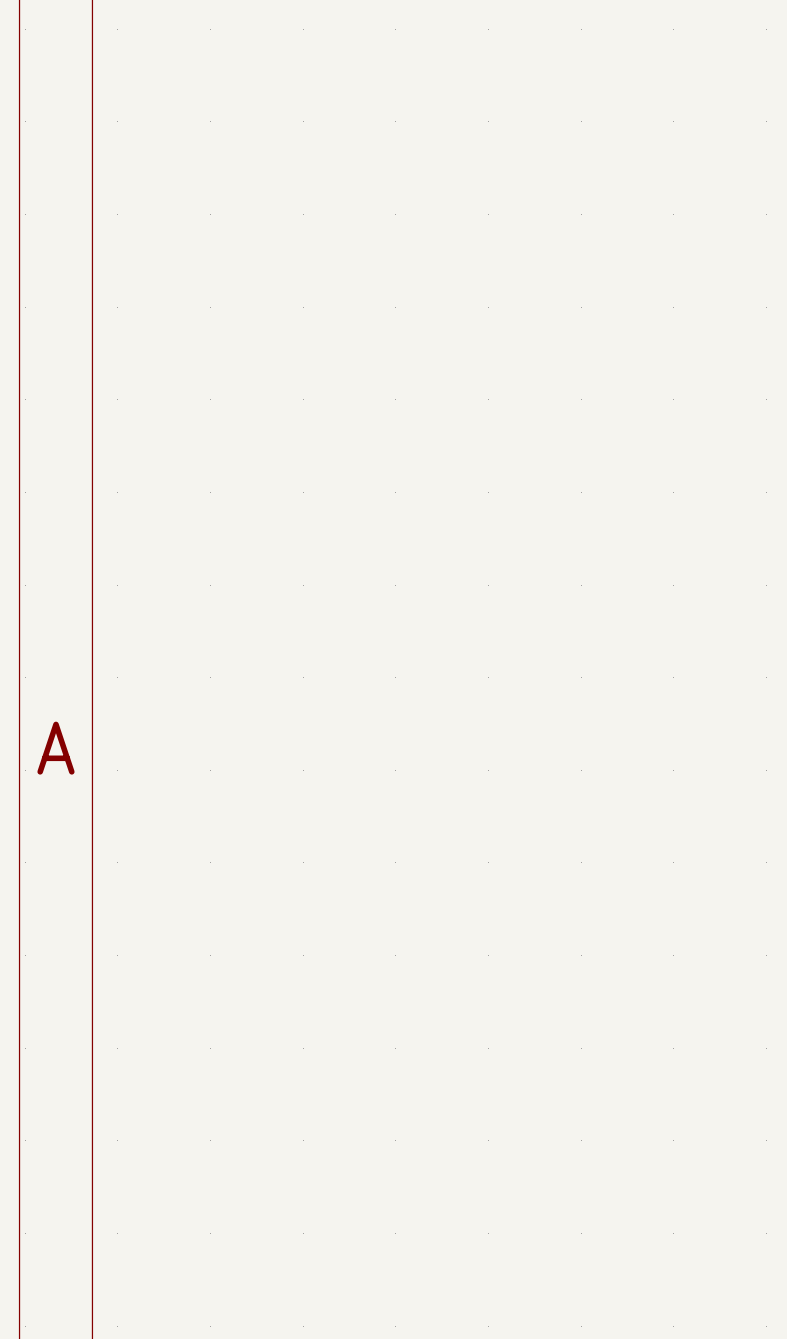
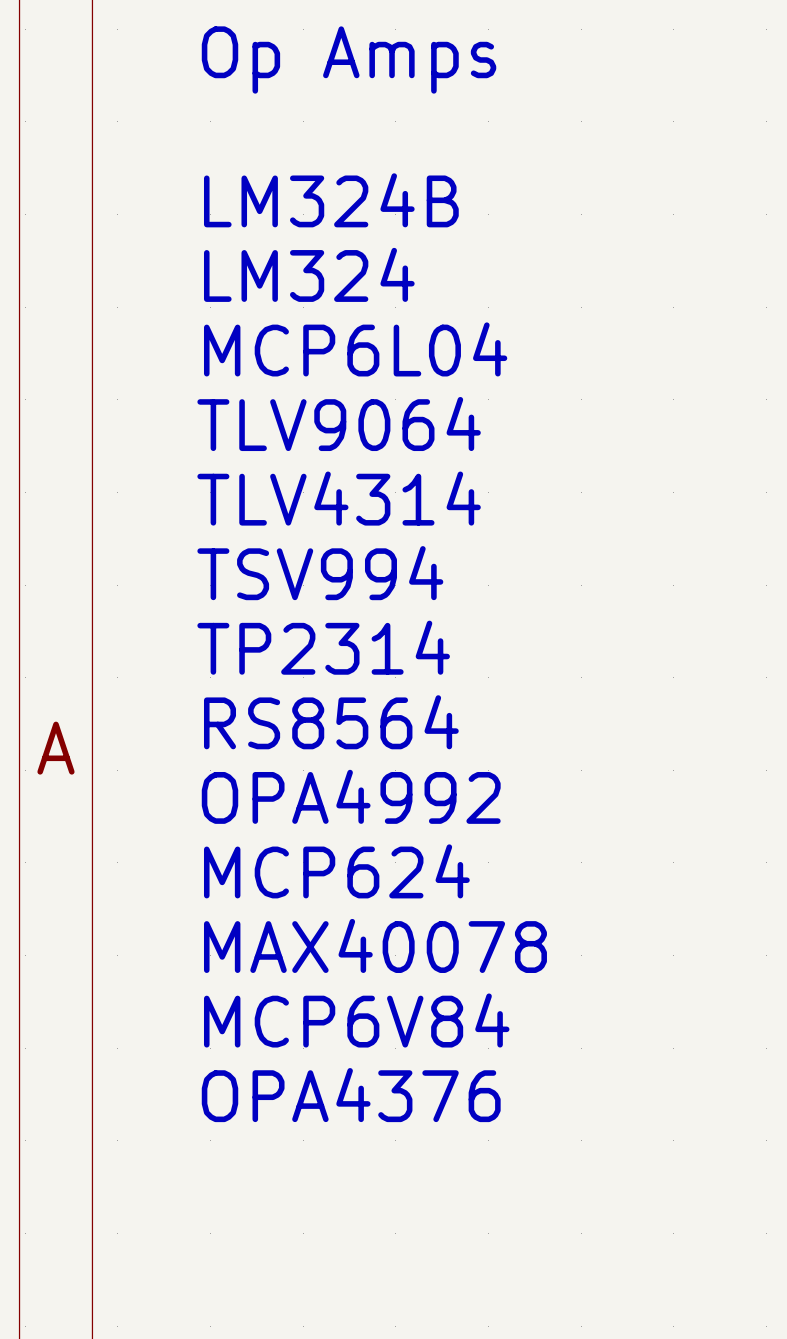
text: none -> Op Amps (349, 60)
text: none -> LM324B (331, 200)
text: none -> LM324 (309, 274)
text: none -> MCP6L04 (355, 349)
text: none -> TLV9064 (339, 424)
text: none -> TLV4314 (339, 498)
text: none -> TSV994 (320, 573)
text: none -> TP2314 (323, 647)
text: none -> RS8564 (331, 722)
text: none -> OPA4992 (351, 796)
text: none -> MCP624 (336, 871)
text: none -> MAX40078 (375, 945)
text: none -> MCP6V84 (356, 1020)
text: none -> OPA4376 (351, 1095)

